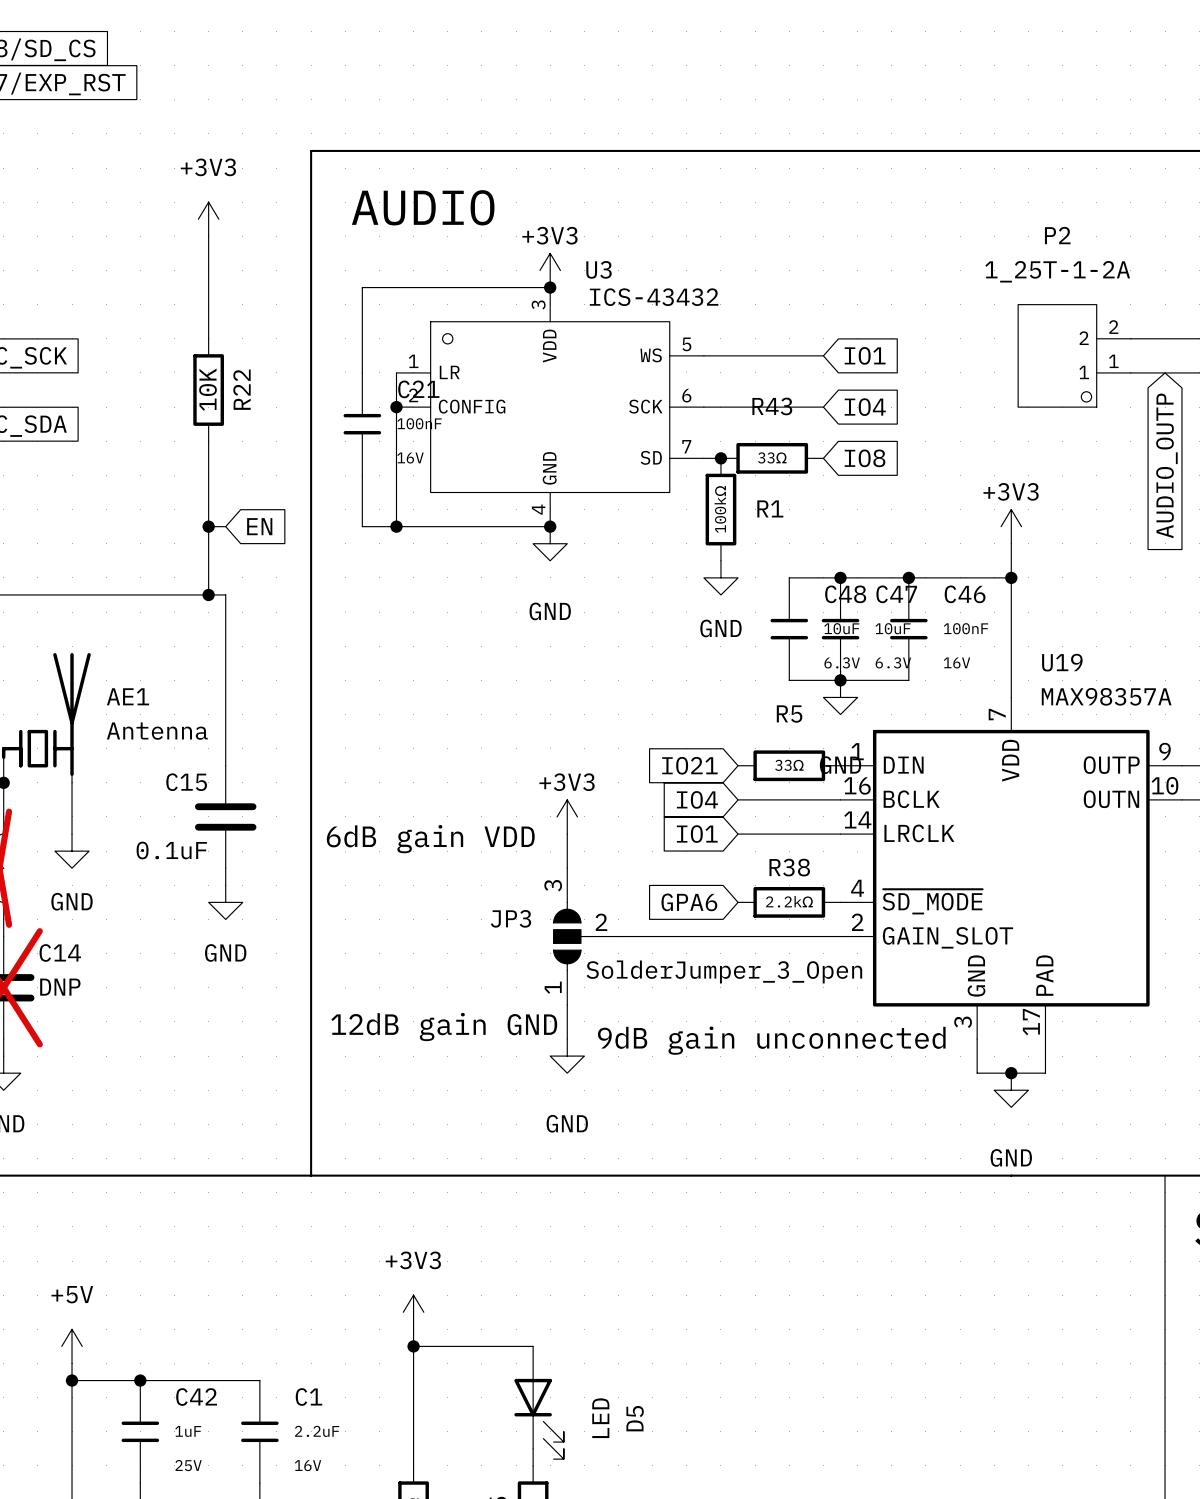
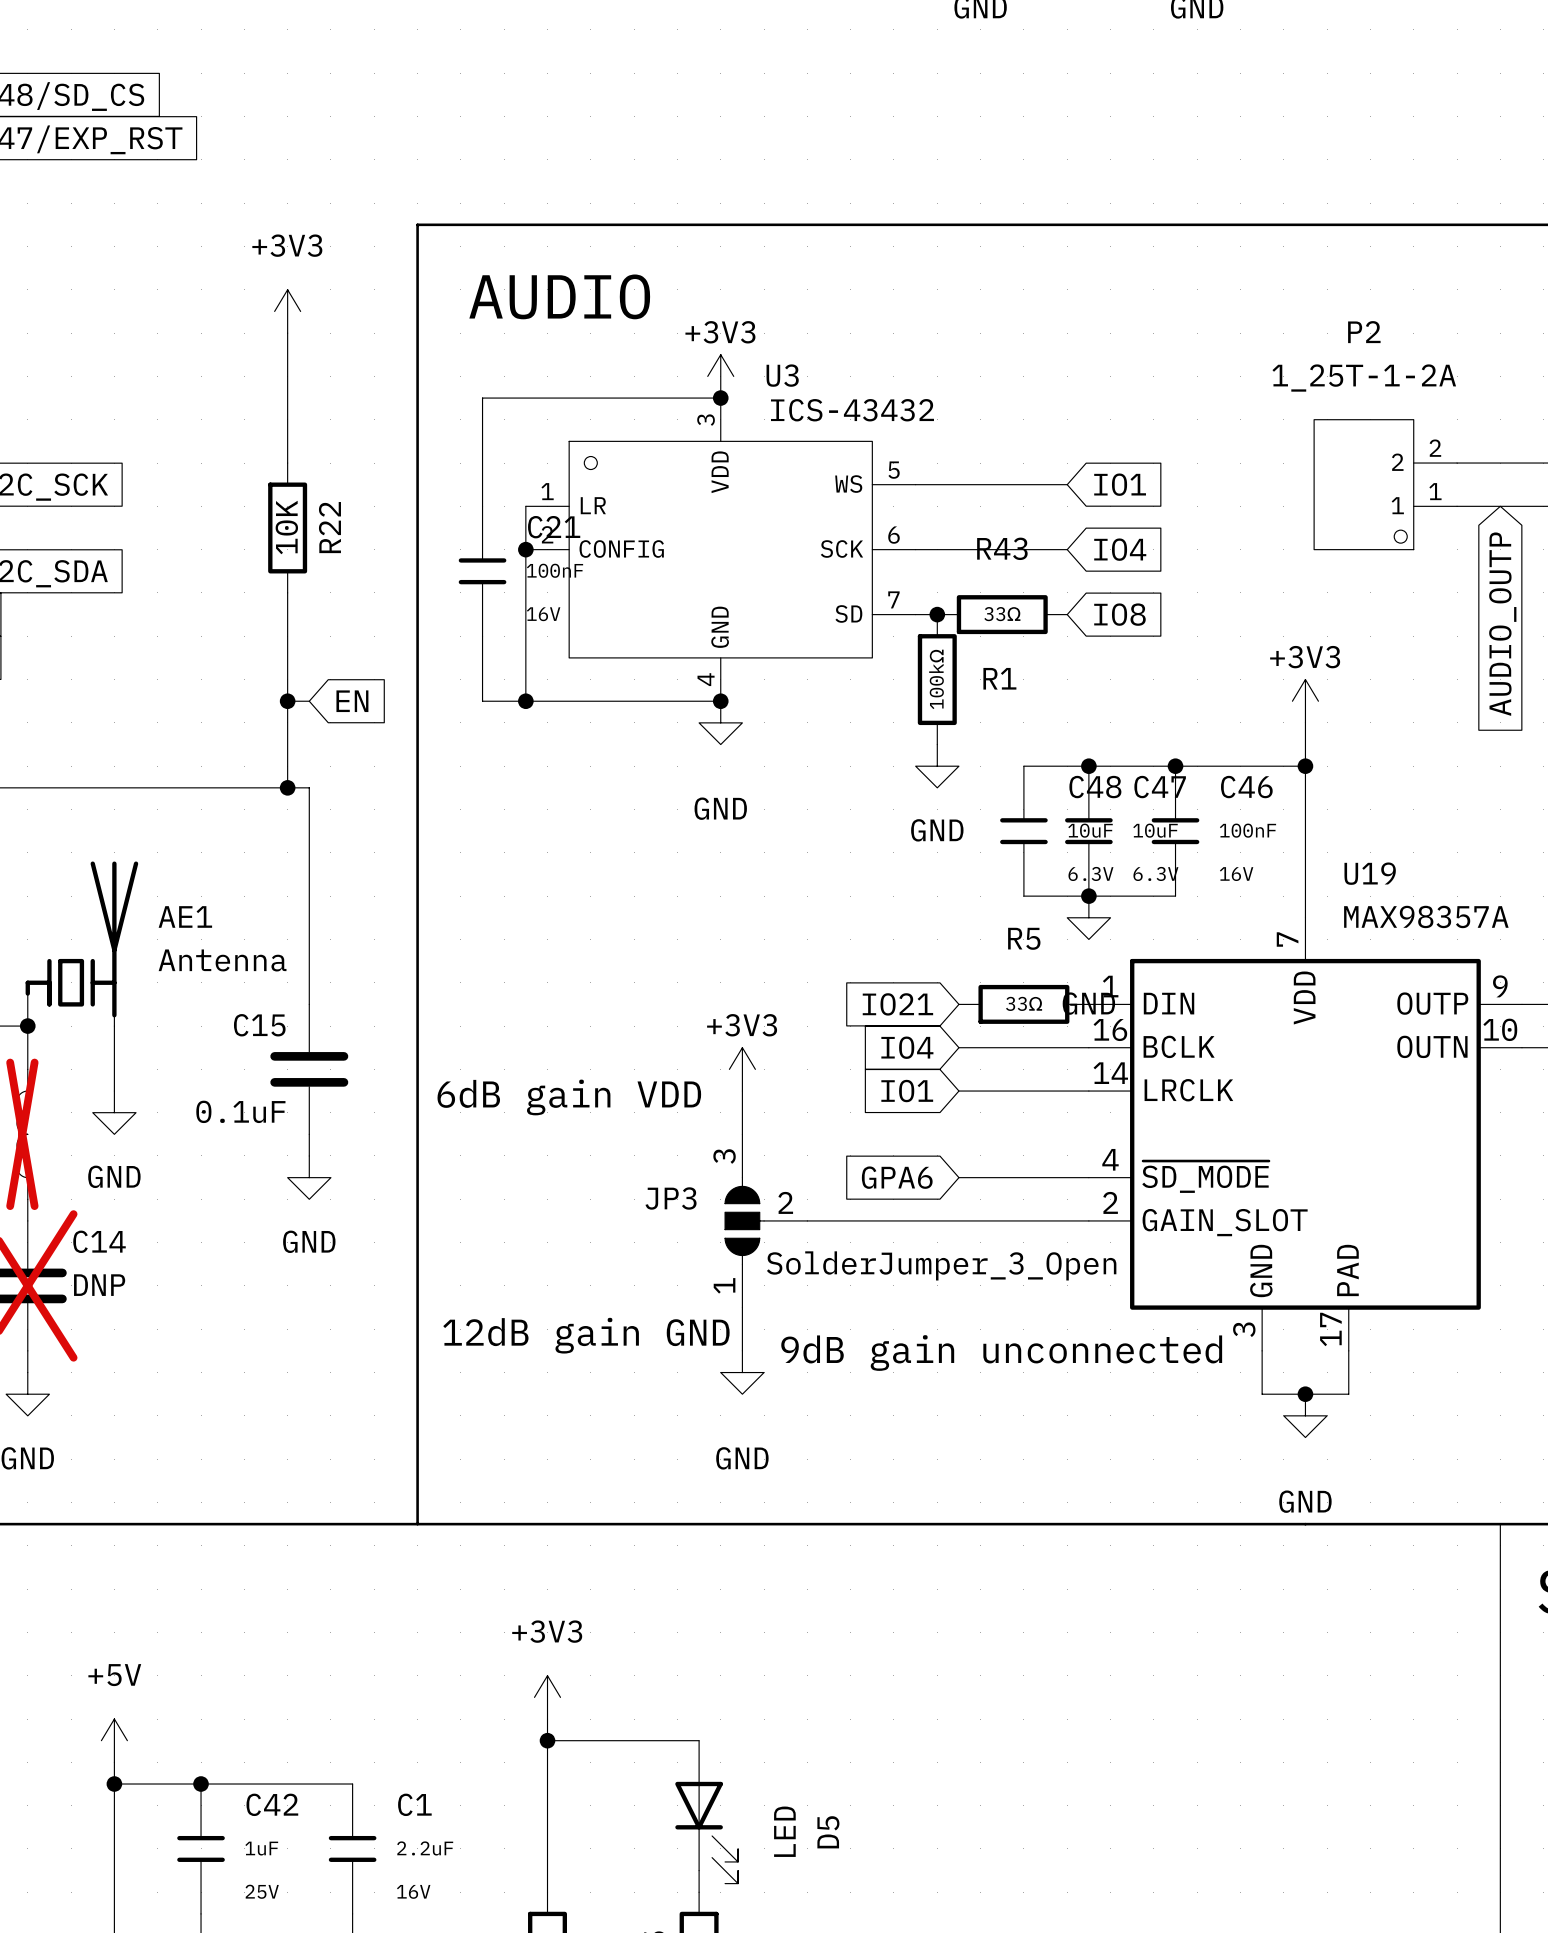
wire: none -> (958, 1177) (1088, 1177)
R38: 2.2kΩ (789, 902) -> none

